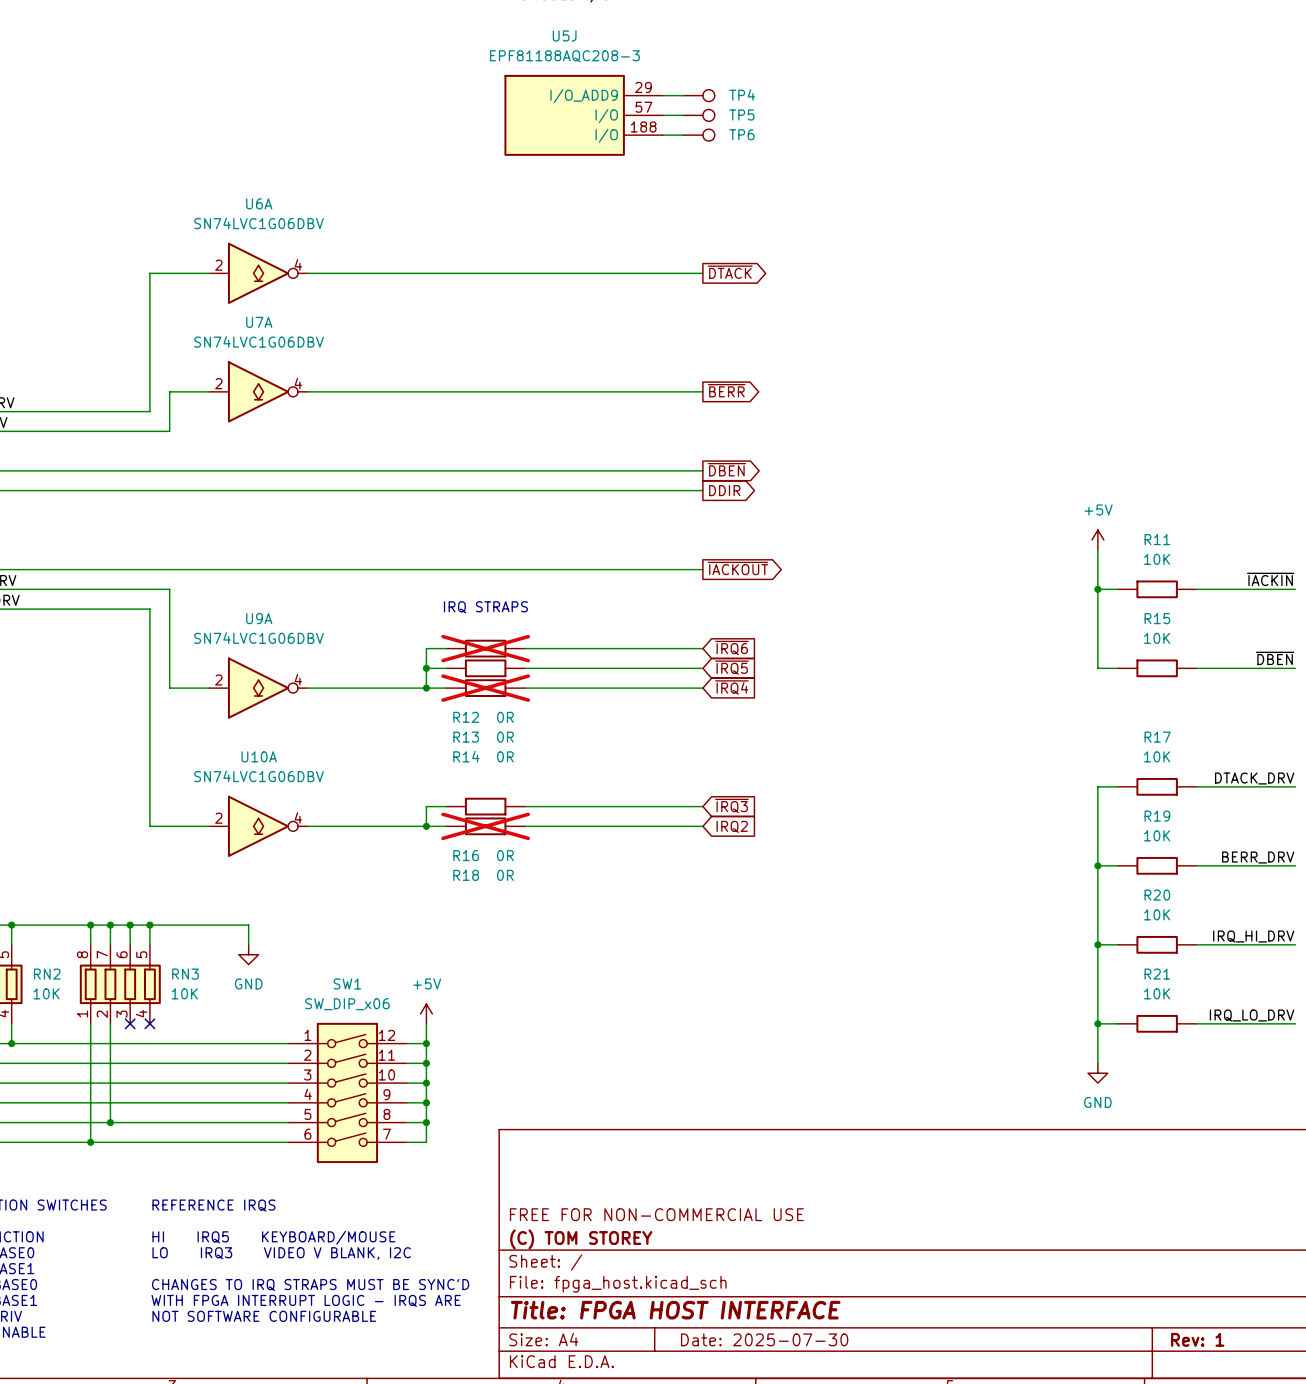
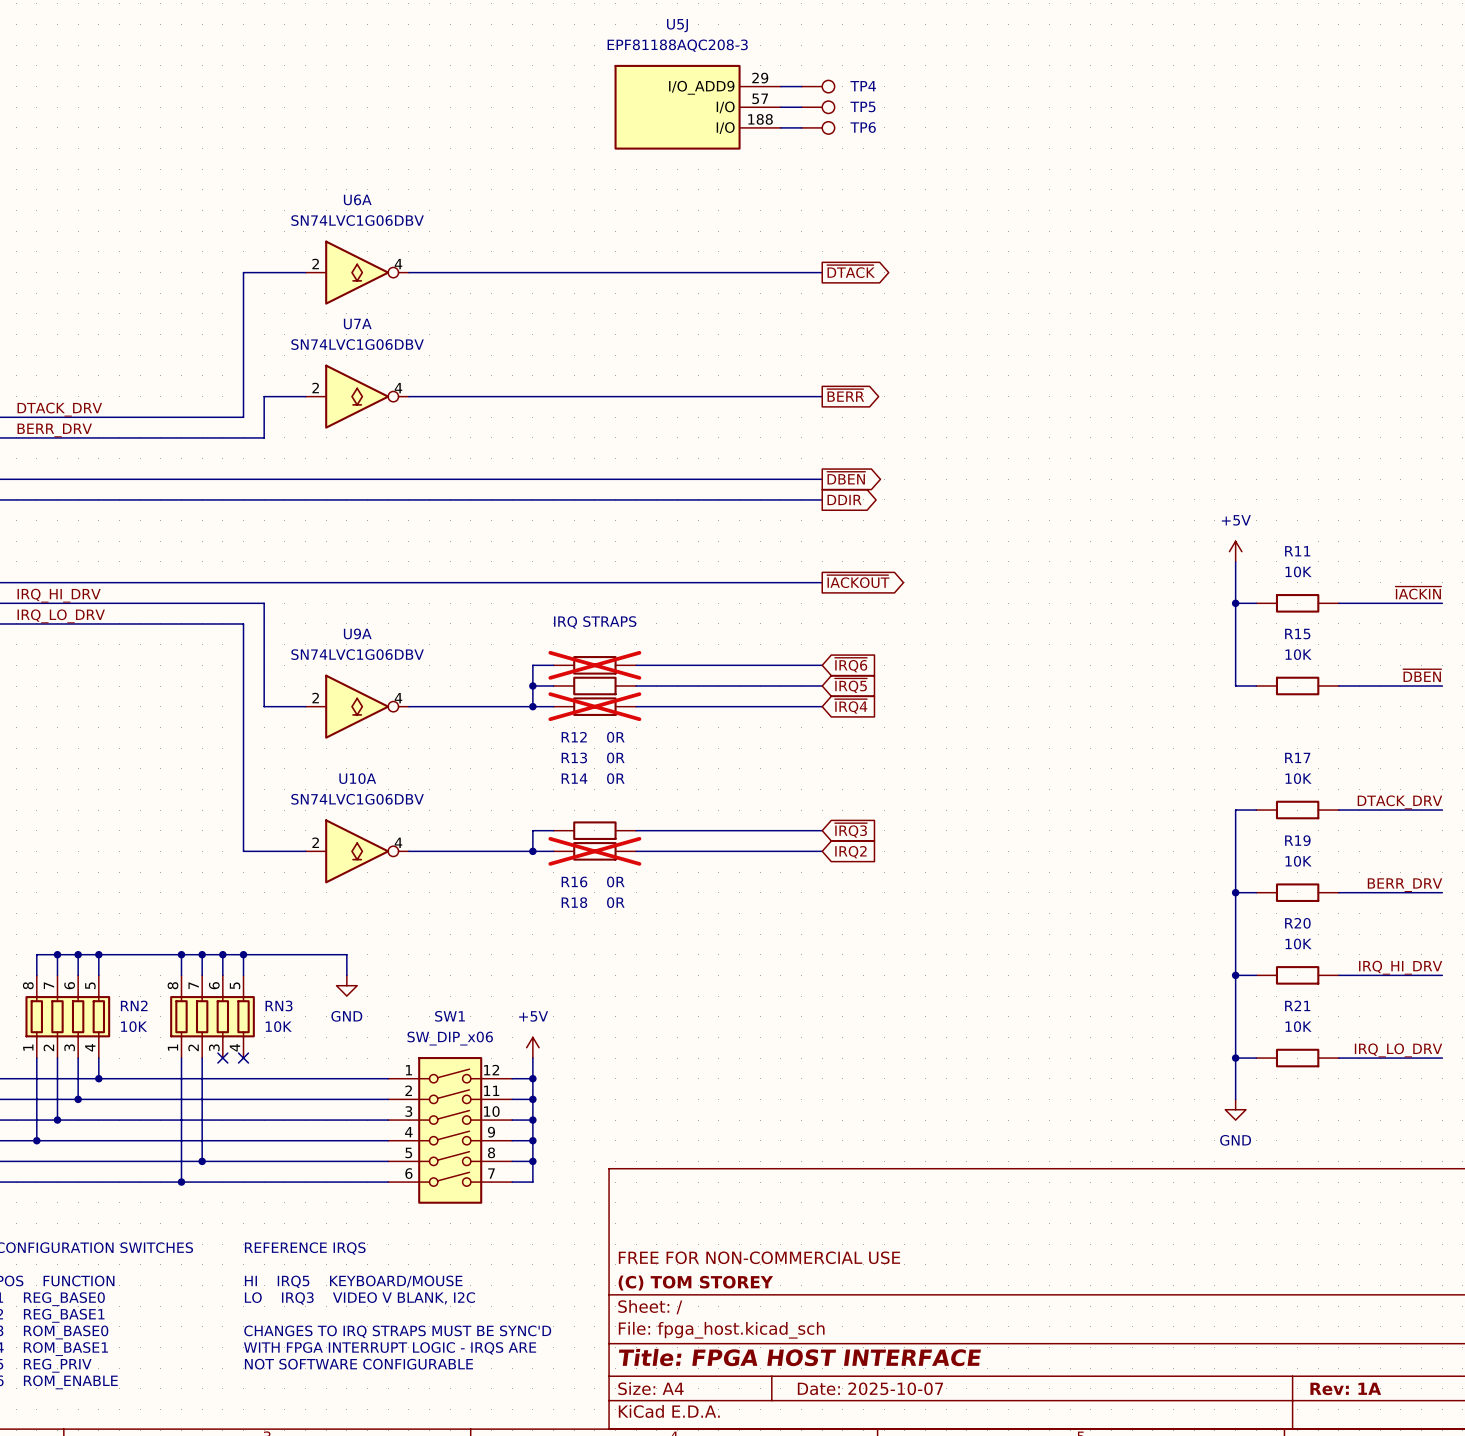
title block: Date: 2025-07-30 (764, 1339) -> Date: 2025-10-07 (870, 1388)
title block: Rev: 1 (1197, 1339) -> Rev: 1A (1345, 1388)

